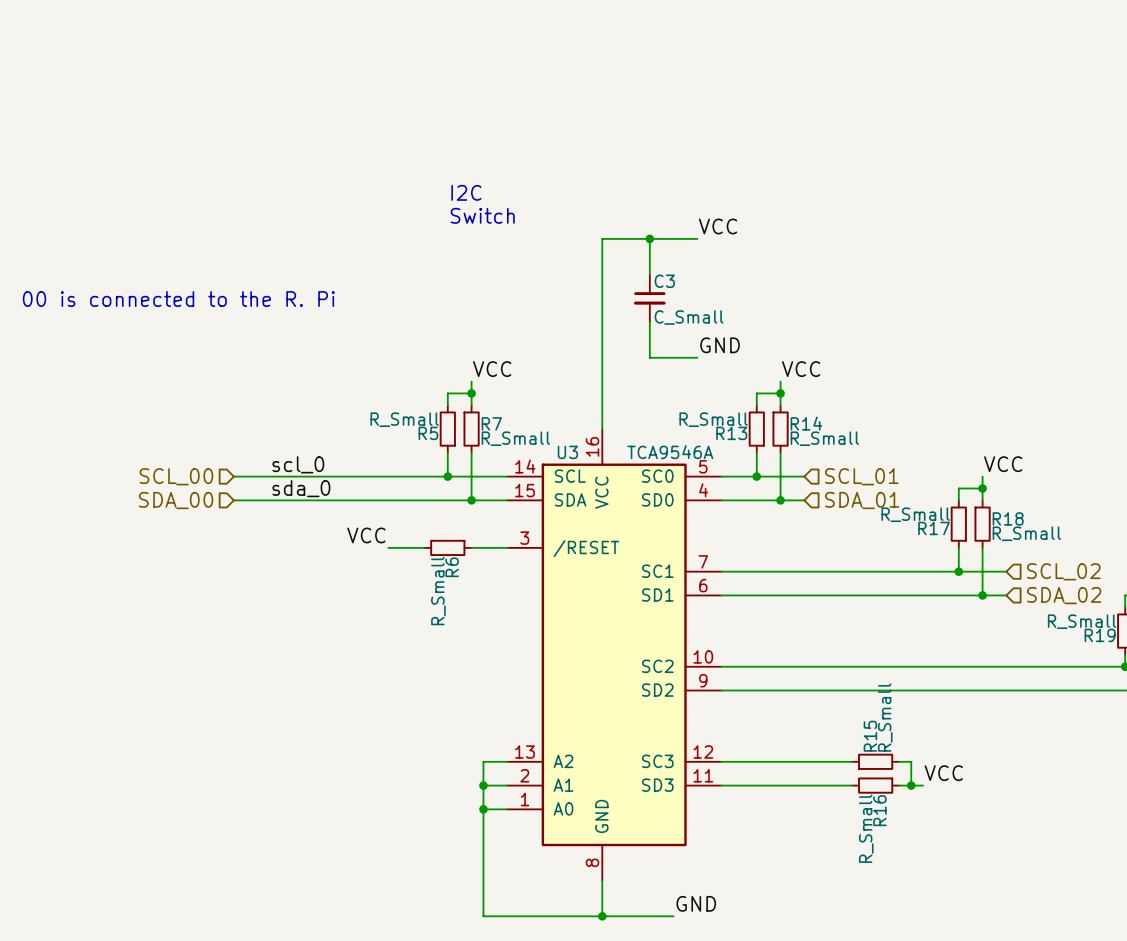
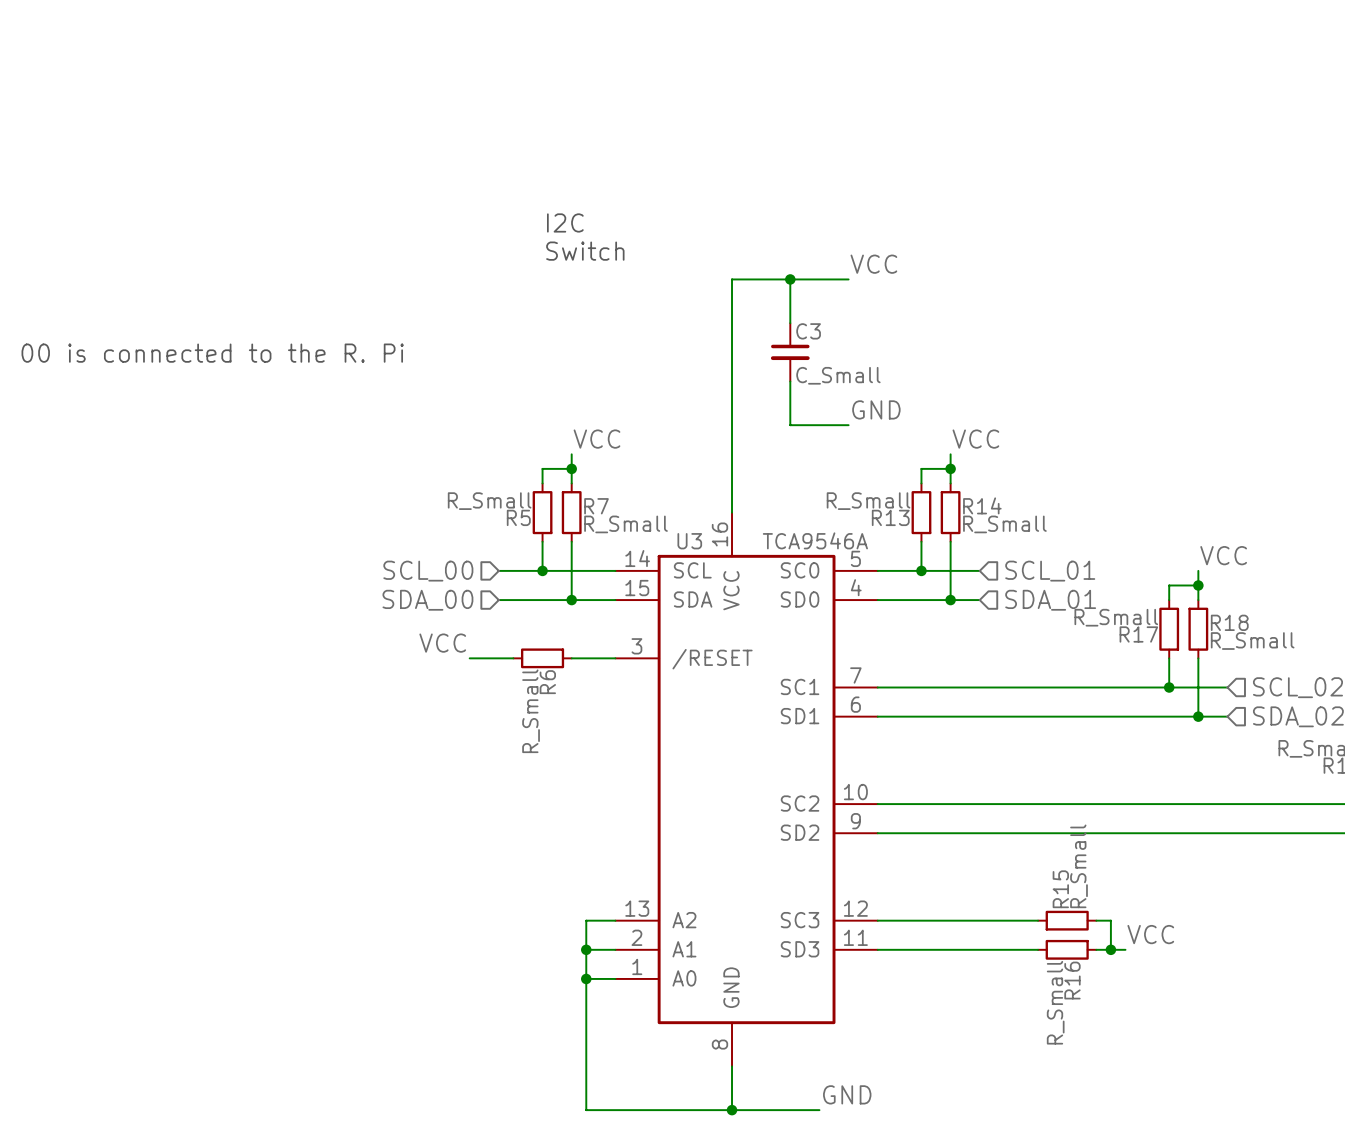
label: scl_0 (298, 464) -> none
hierarchical label position: SCL_00 (176, 476) -> SCL_00 (428, 571)
wire: (233, 476) (412, 476) -> none
label: sda_0 (301, 488) -> none
hierarchical label position: SDA_00 (176, 500) -> SDA_00 (427, 600)
wire: (233, 500) (412, 500) -> none

